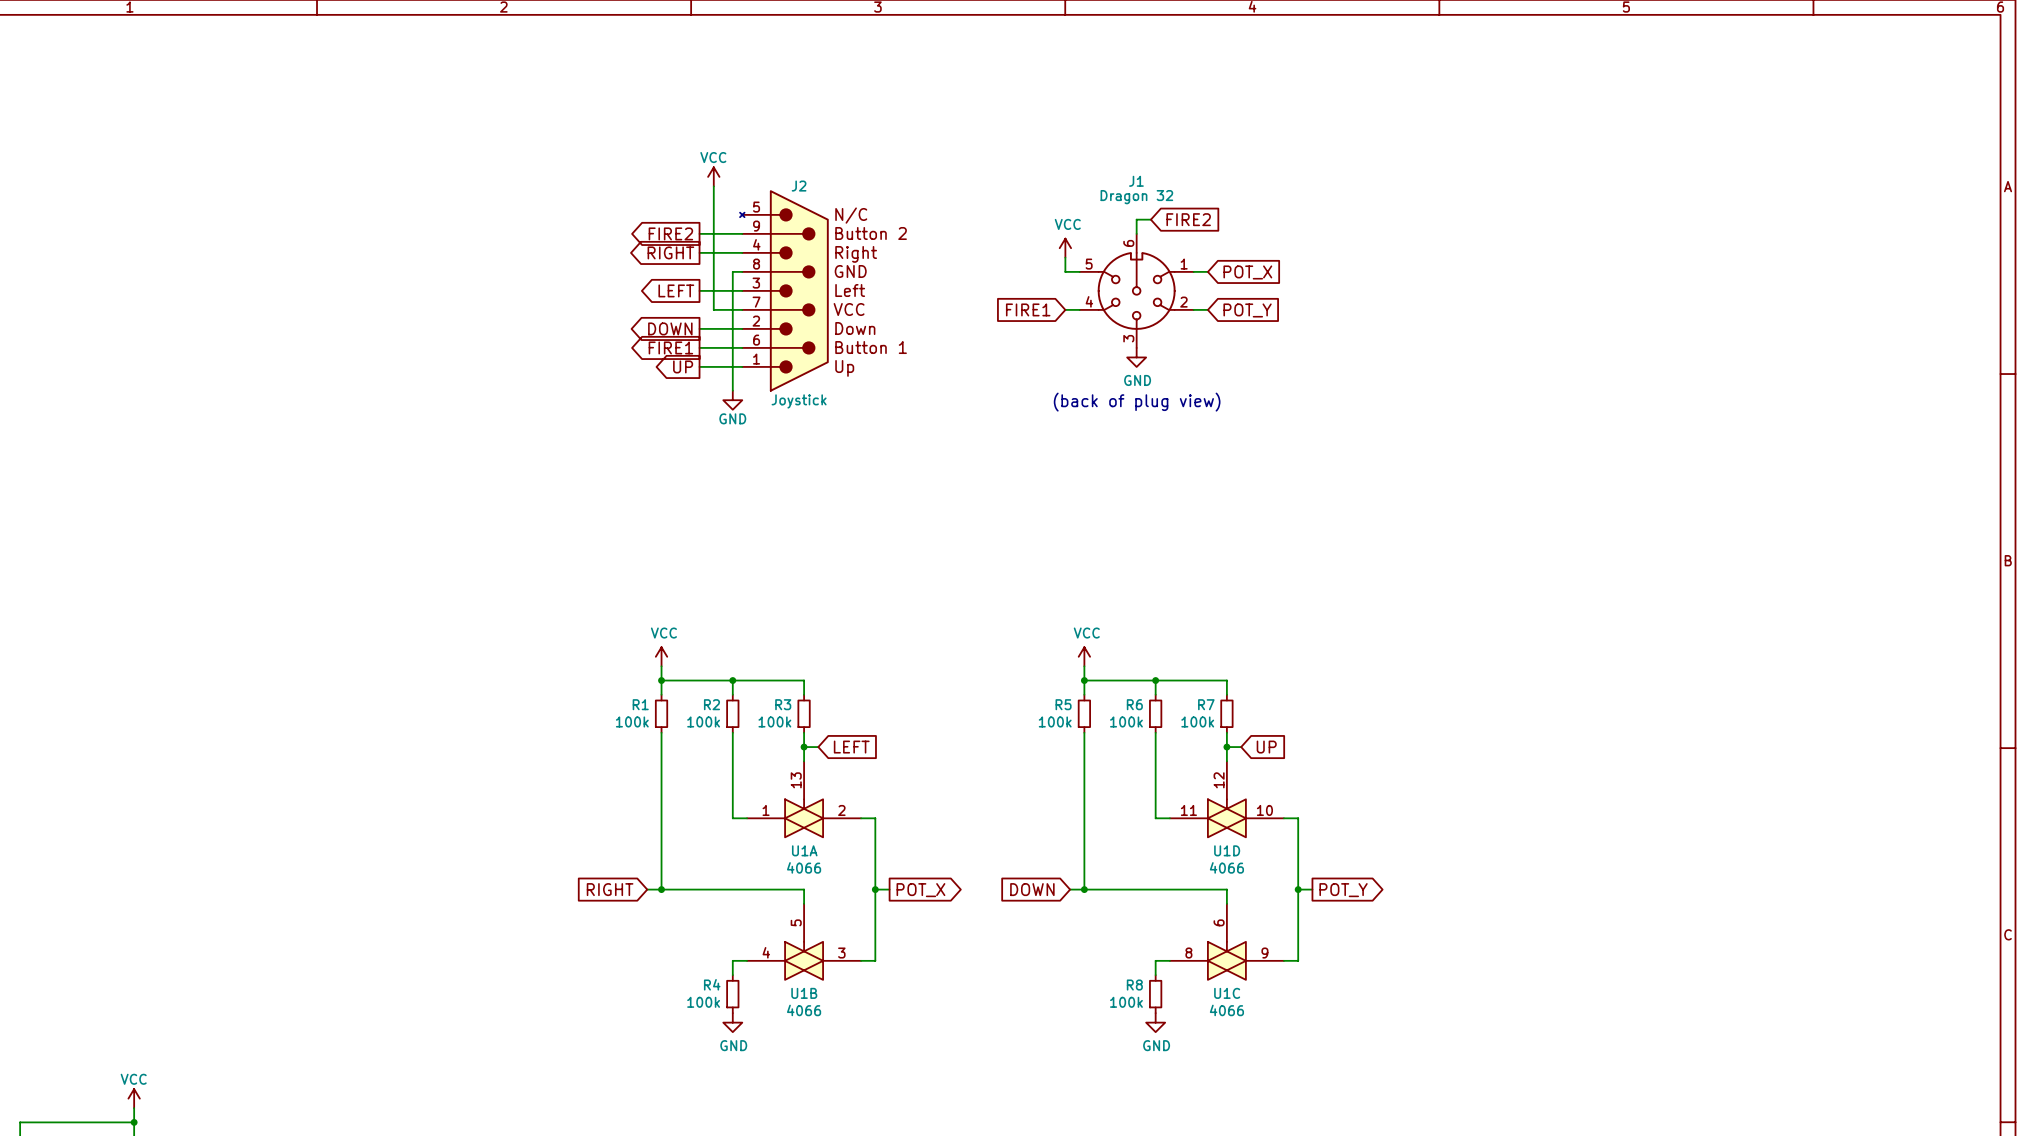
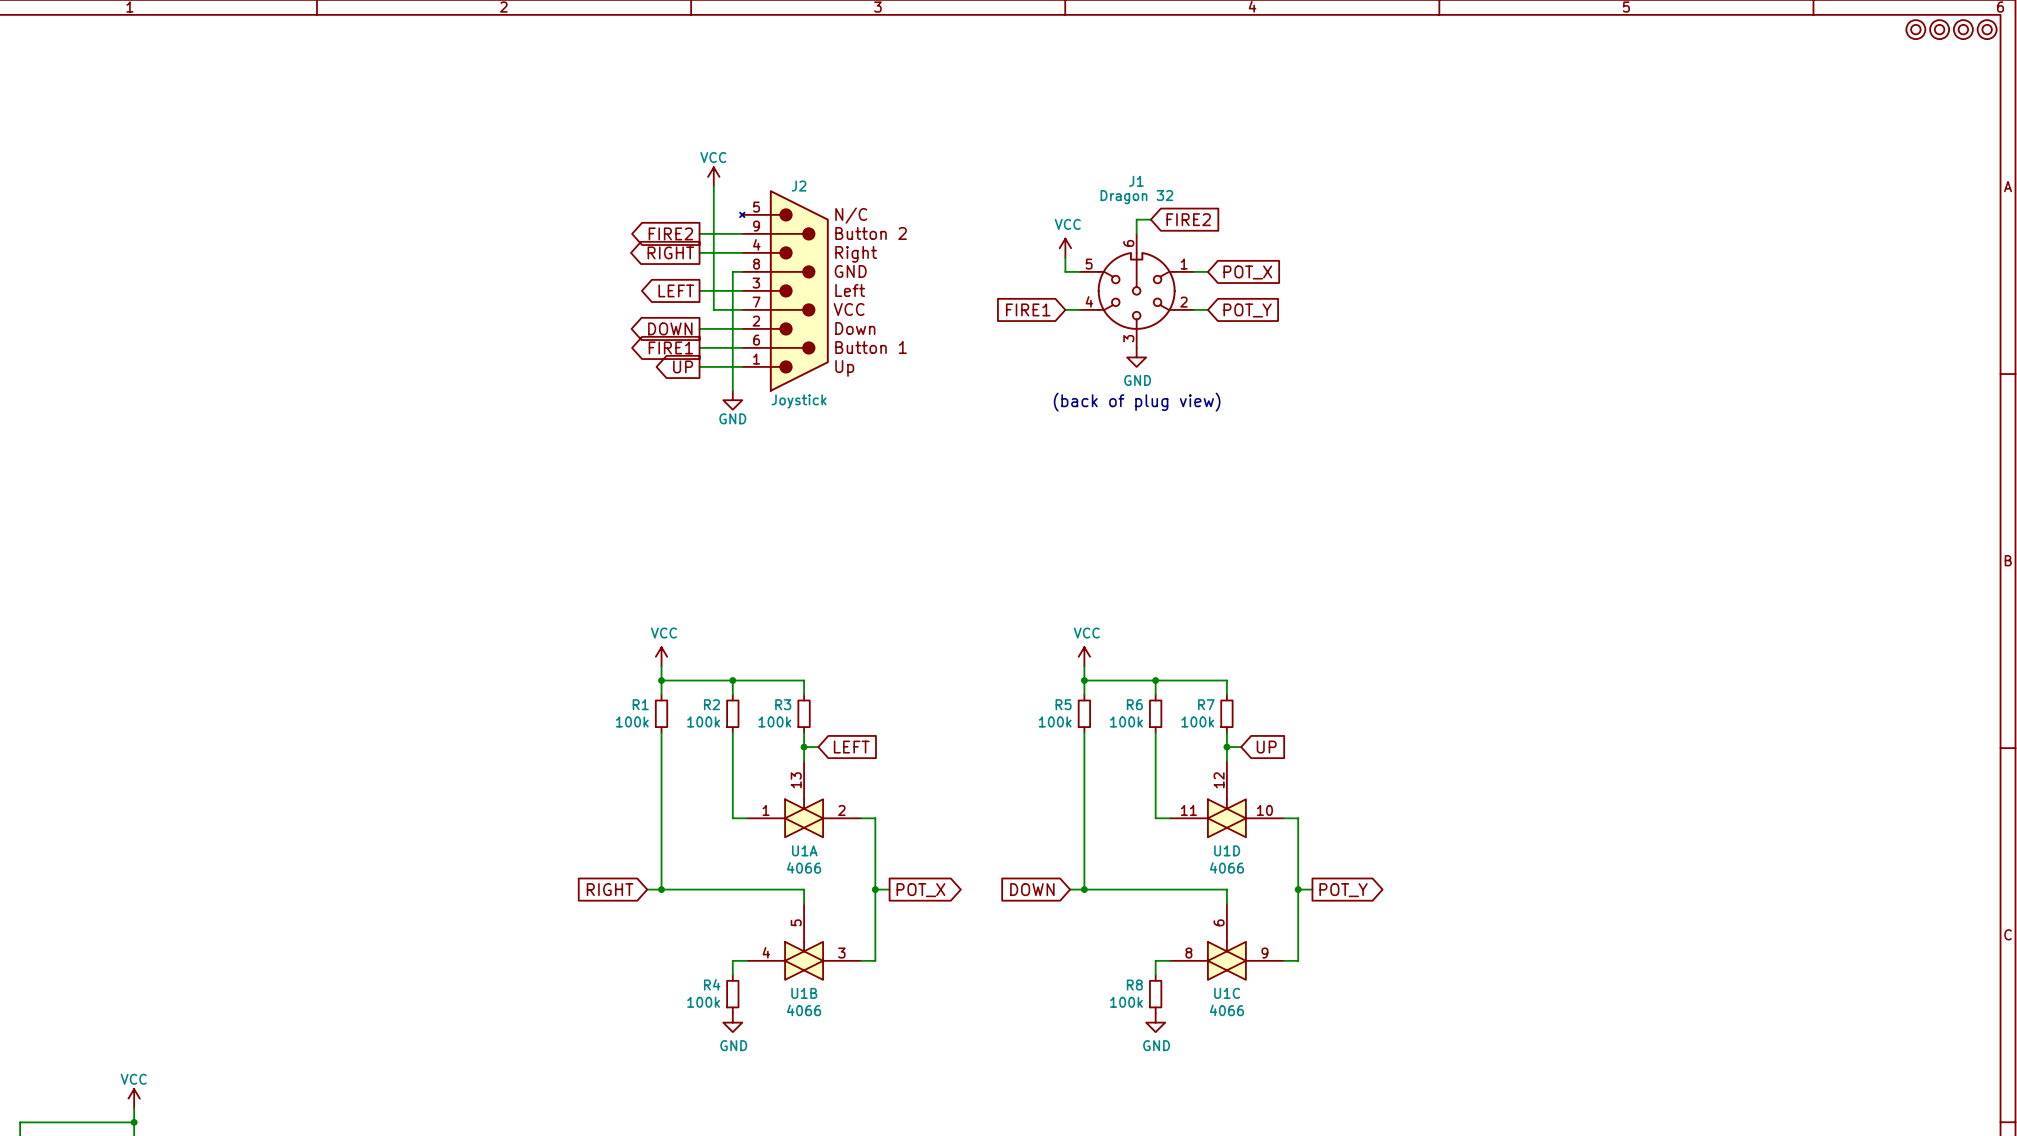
part: none -> (1915, 29)
part: none -> (1939, 29)
part: none -> (1963, 29)
part: none -> (1987, 29)

